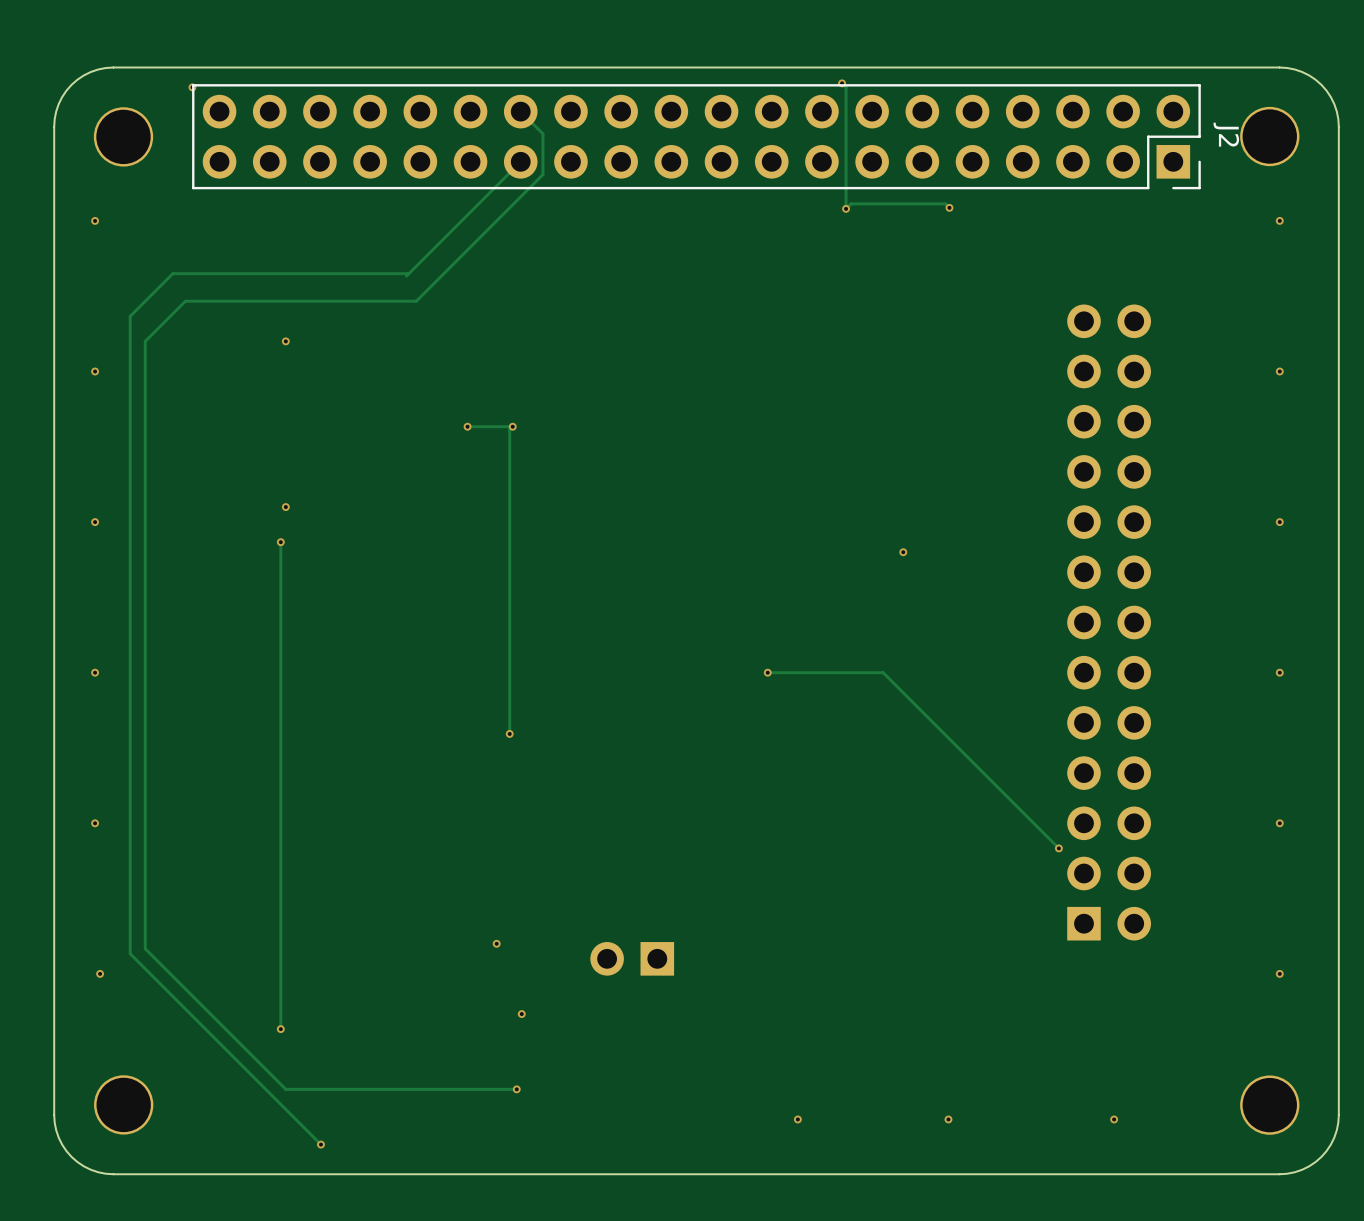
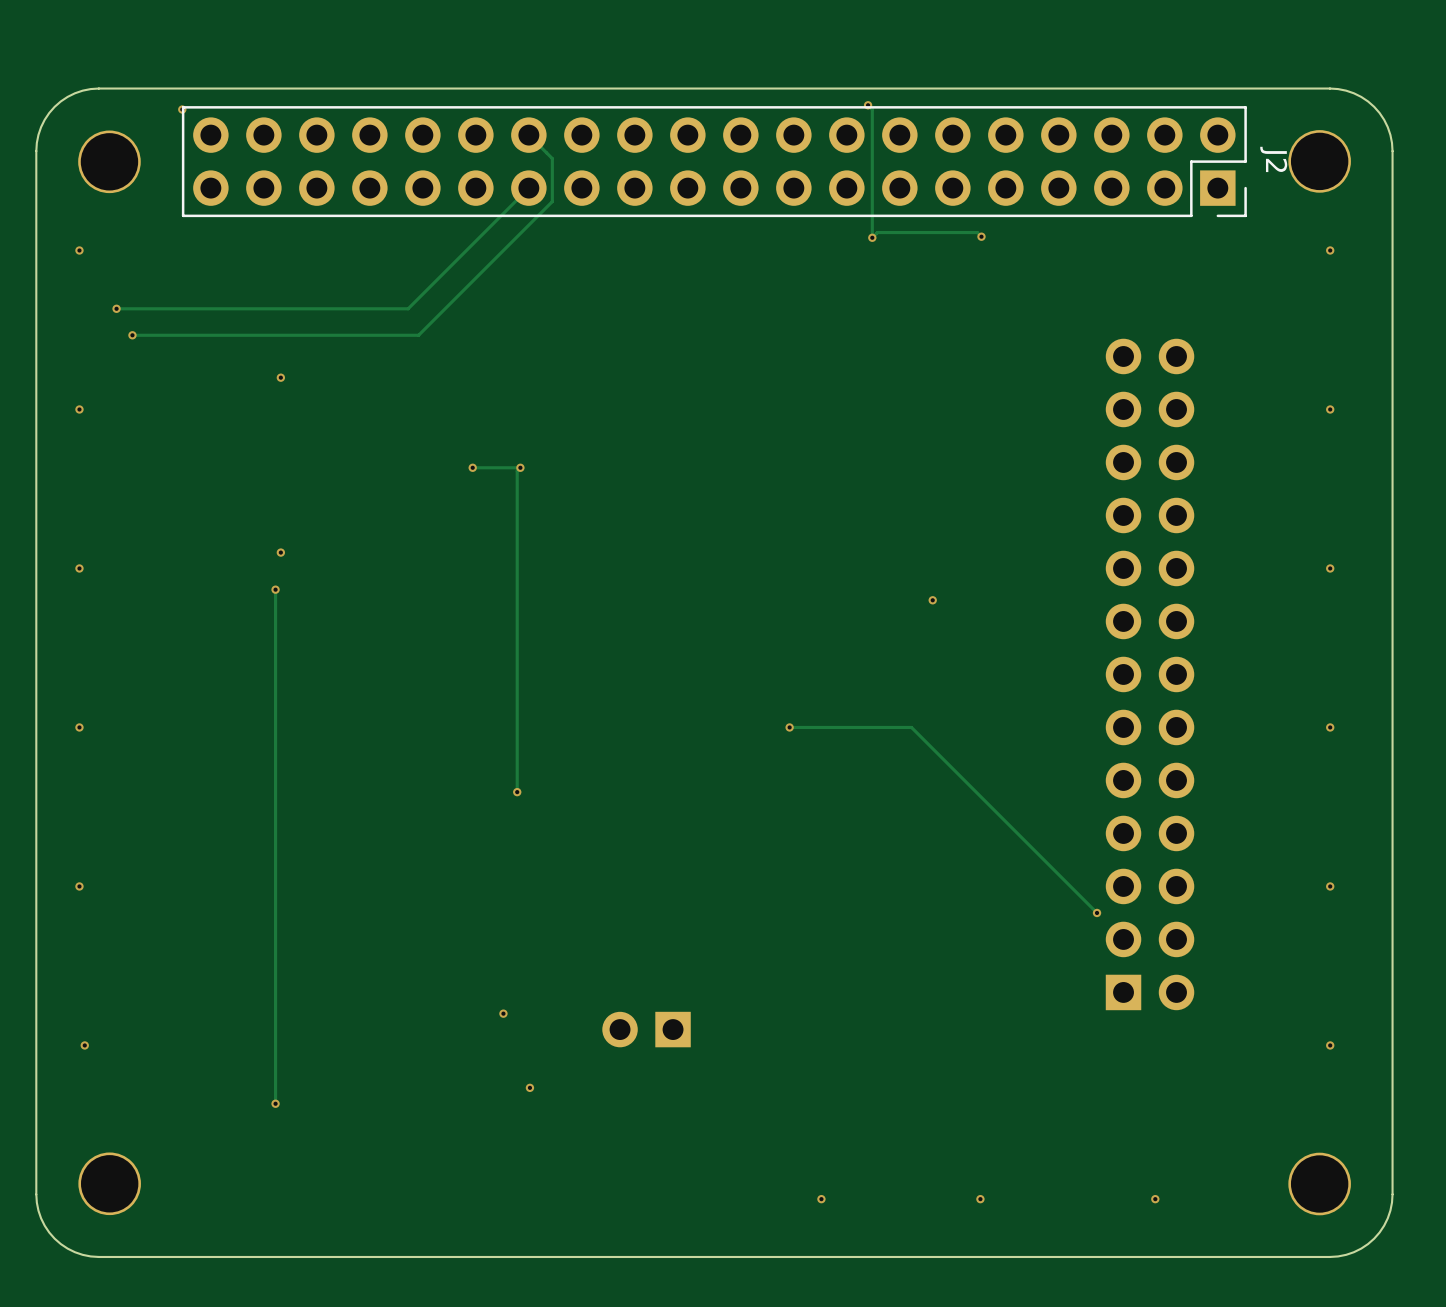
track: (408, 273) (172, 273) (130, 316) (130, 953) (320, 1144) -> none
via: none -> (116, 308)
track: none -> (408, 308) (116, 308)
via: none -> (132, 335)
track: (185, 301) (145, 341) (145, 948) (285, 1089) (516, 1089) -> (174, 335) (132, 335)
via: (516, 1089) -> none
via: (320, 1144) -> none

